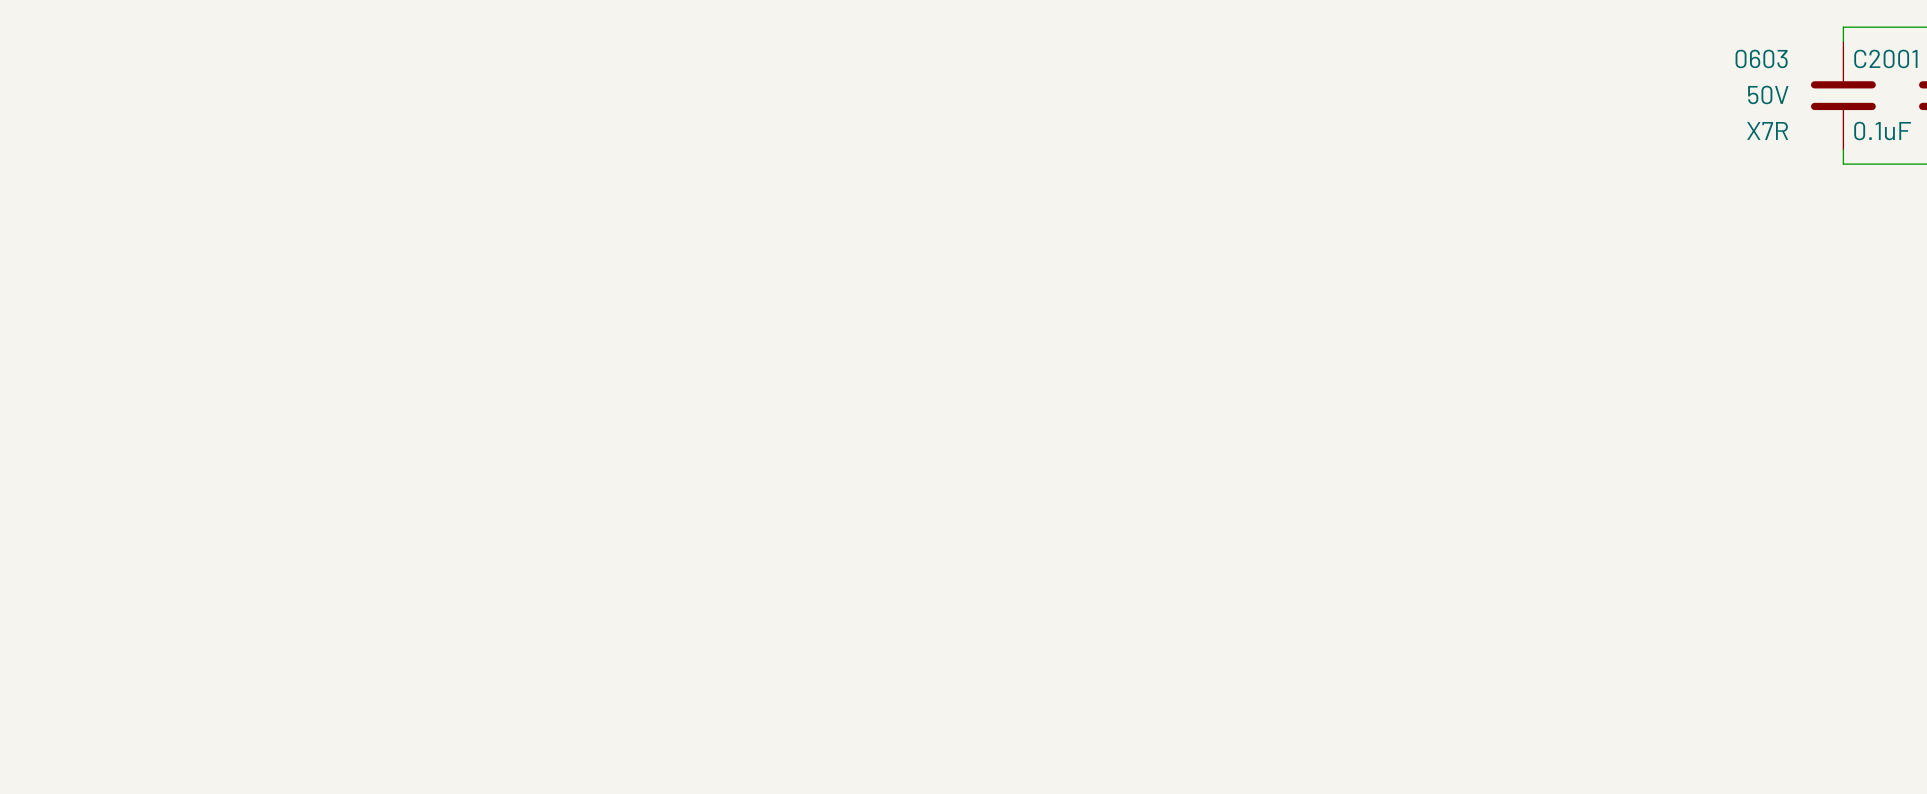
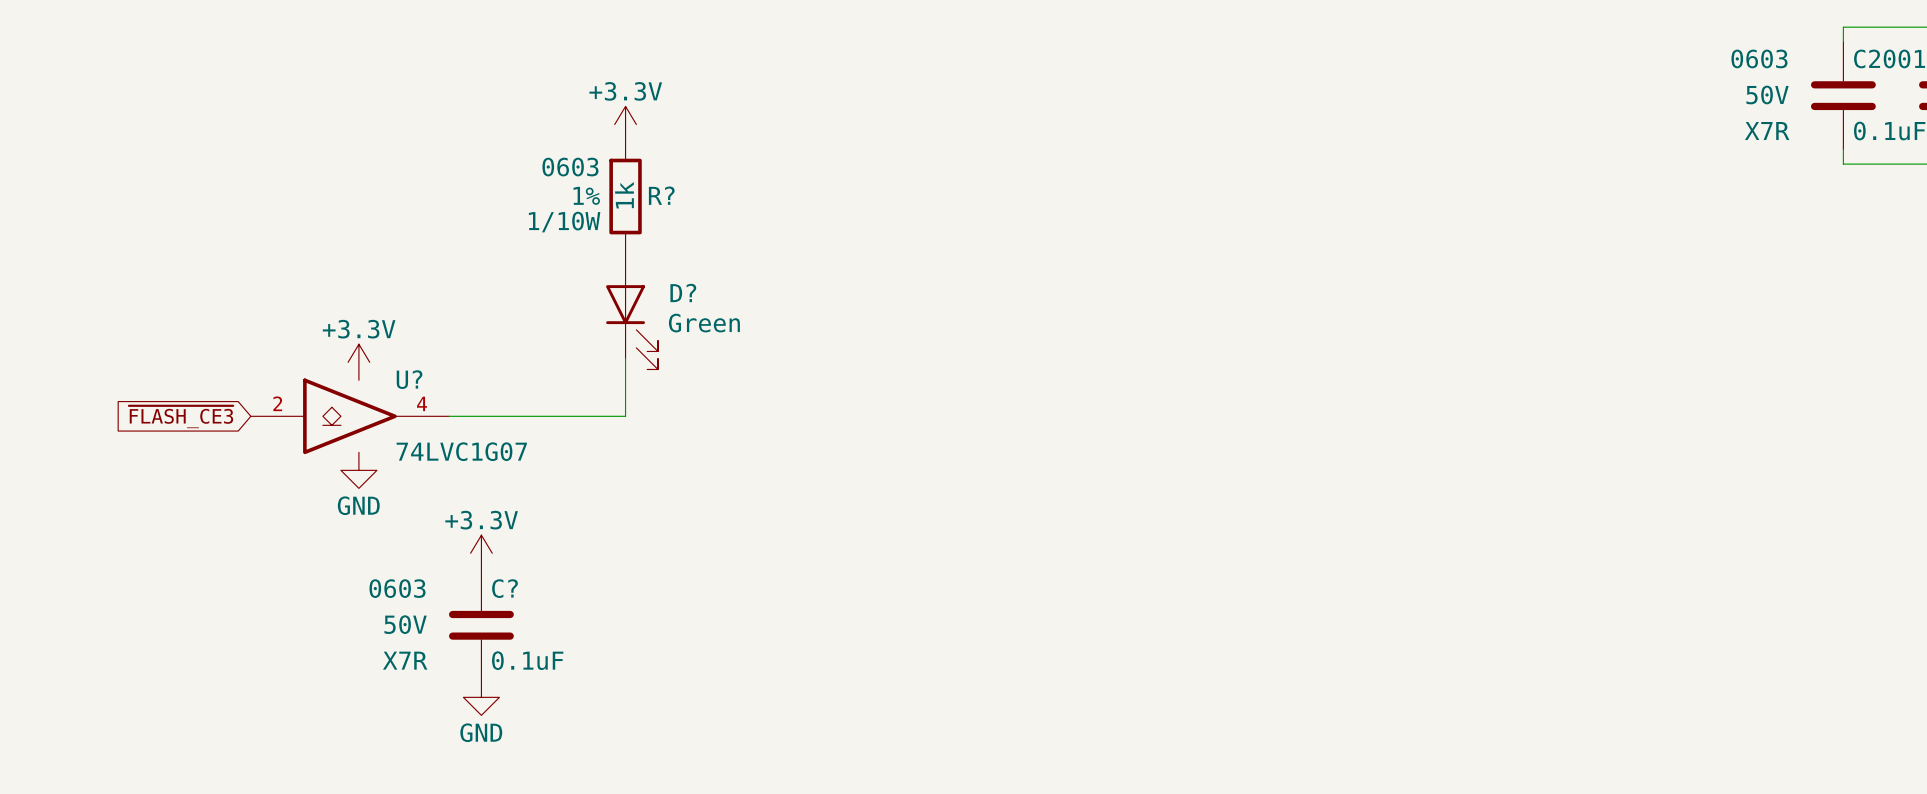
power symbol: none -> +3.3V (625, 124)
R?: none -> 1k (625, 196)
D?: none -> Green (632, 310)
wire: none -> (625, 358) (625, 416) (449, 416)
power symbol: none -> +3.3V (358, 362)
global label: none -> ~{FLASH_CE3} (181, 416)
U?: none -> 74LVC1G07 (349, 416)
power symbol: none -> GND (358, 470)
power symbol: none -> +3.3V (481, 553)
C?: none -> 0.1uF (481, 625)
power symbol: none -> GND (481, 697)

